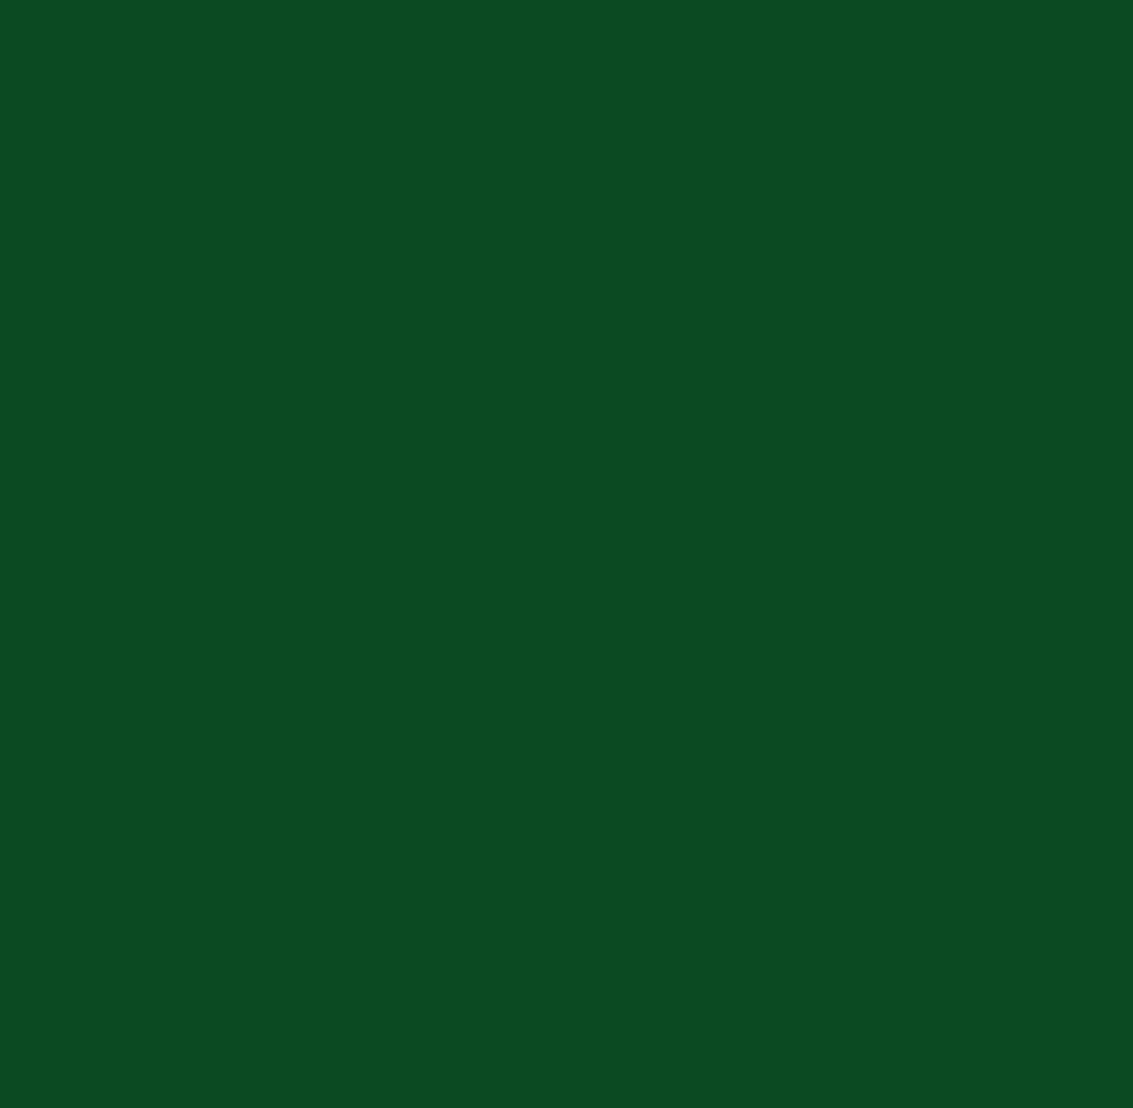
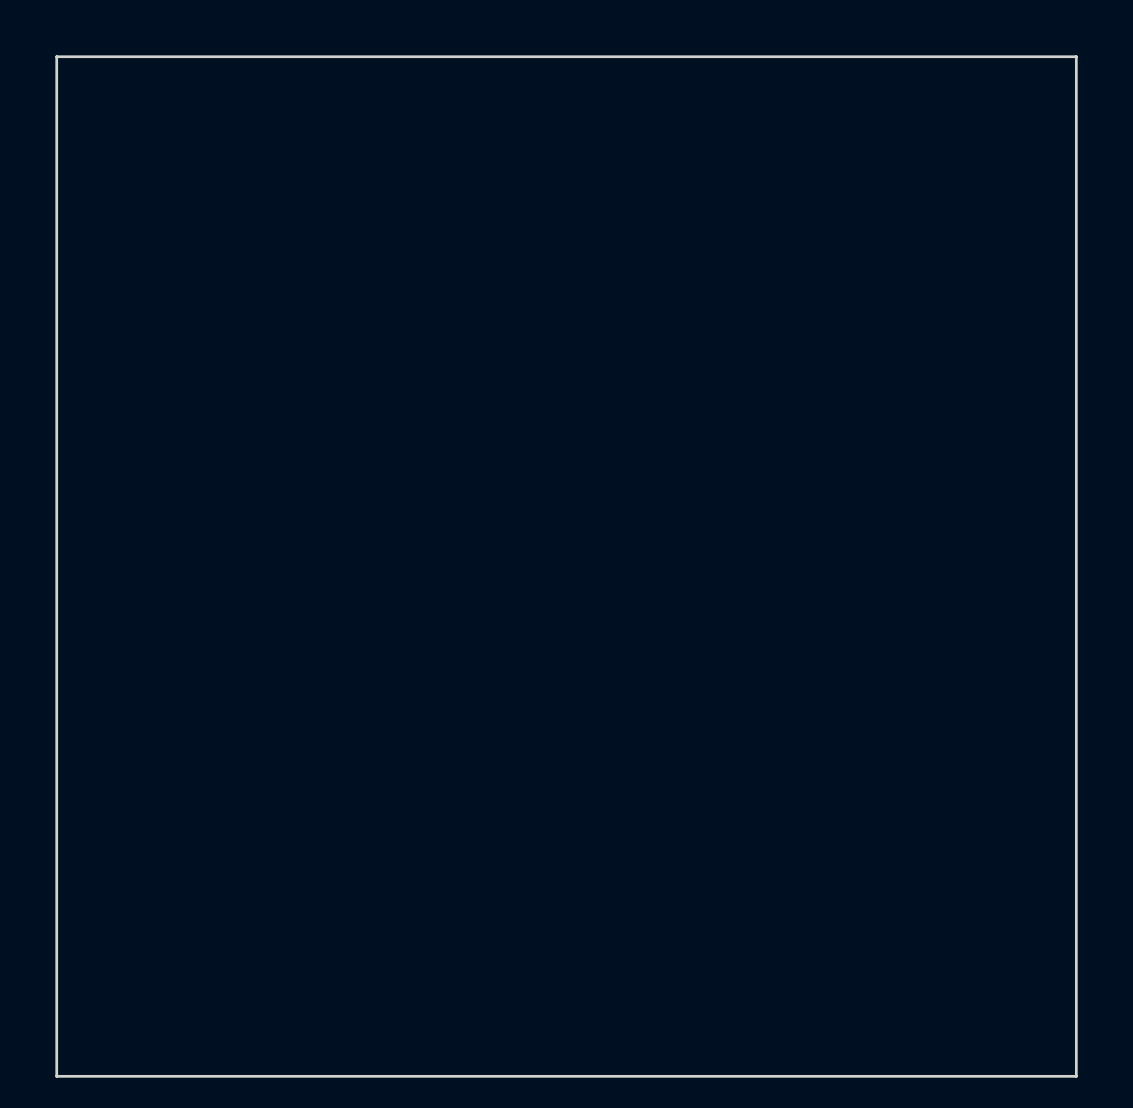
board edge: none -> (56, 56) (1076, 56) (1076, 1076) (56, 1076) (56, 56)

